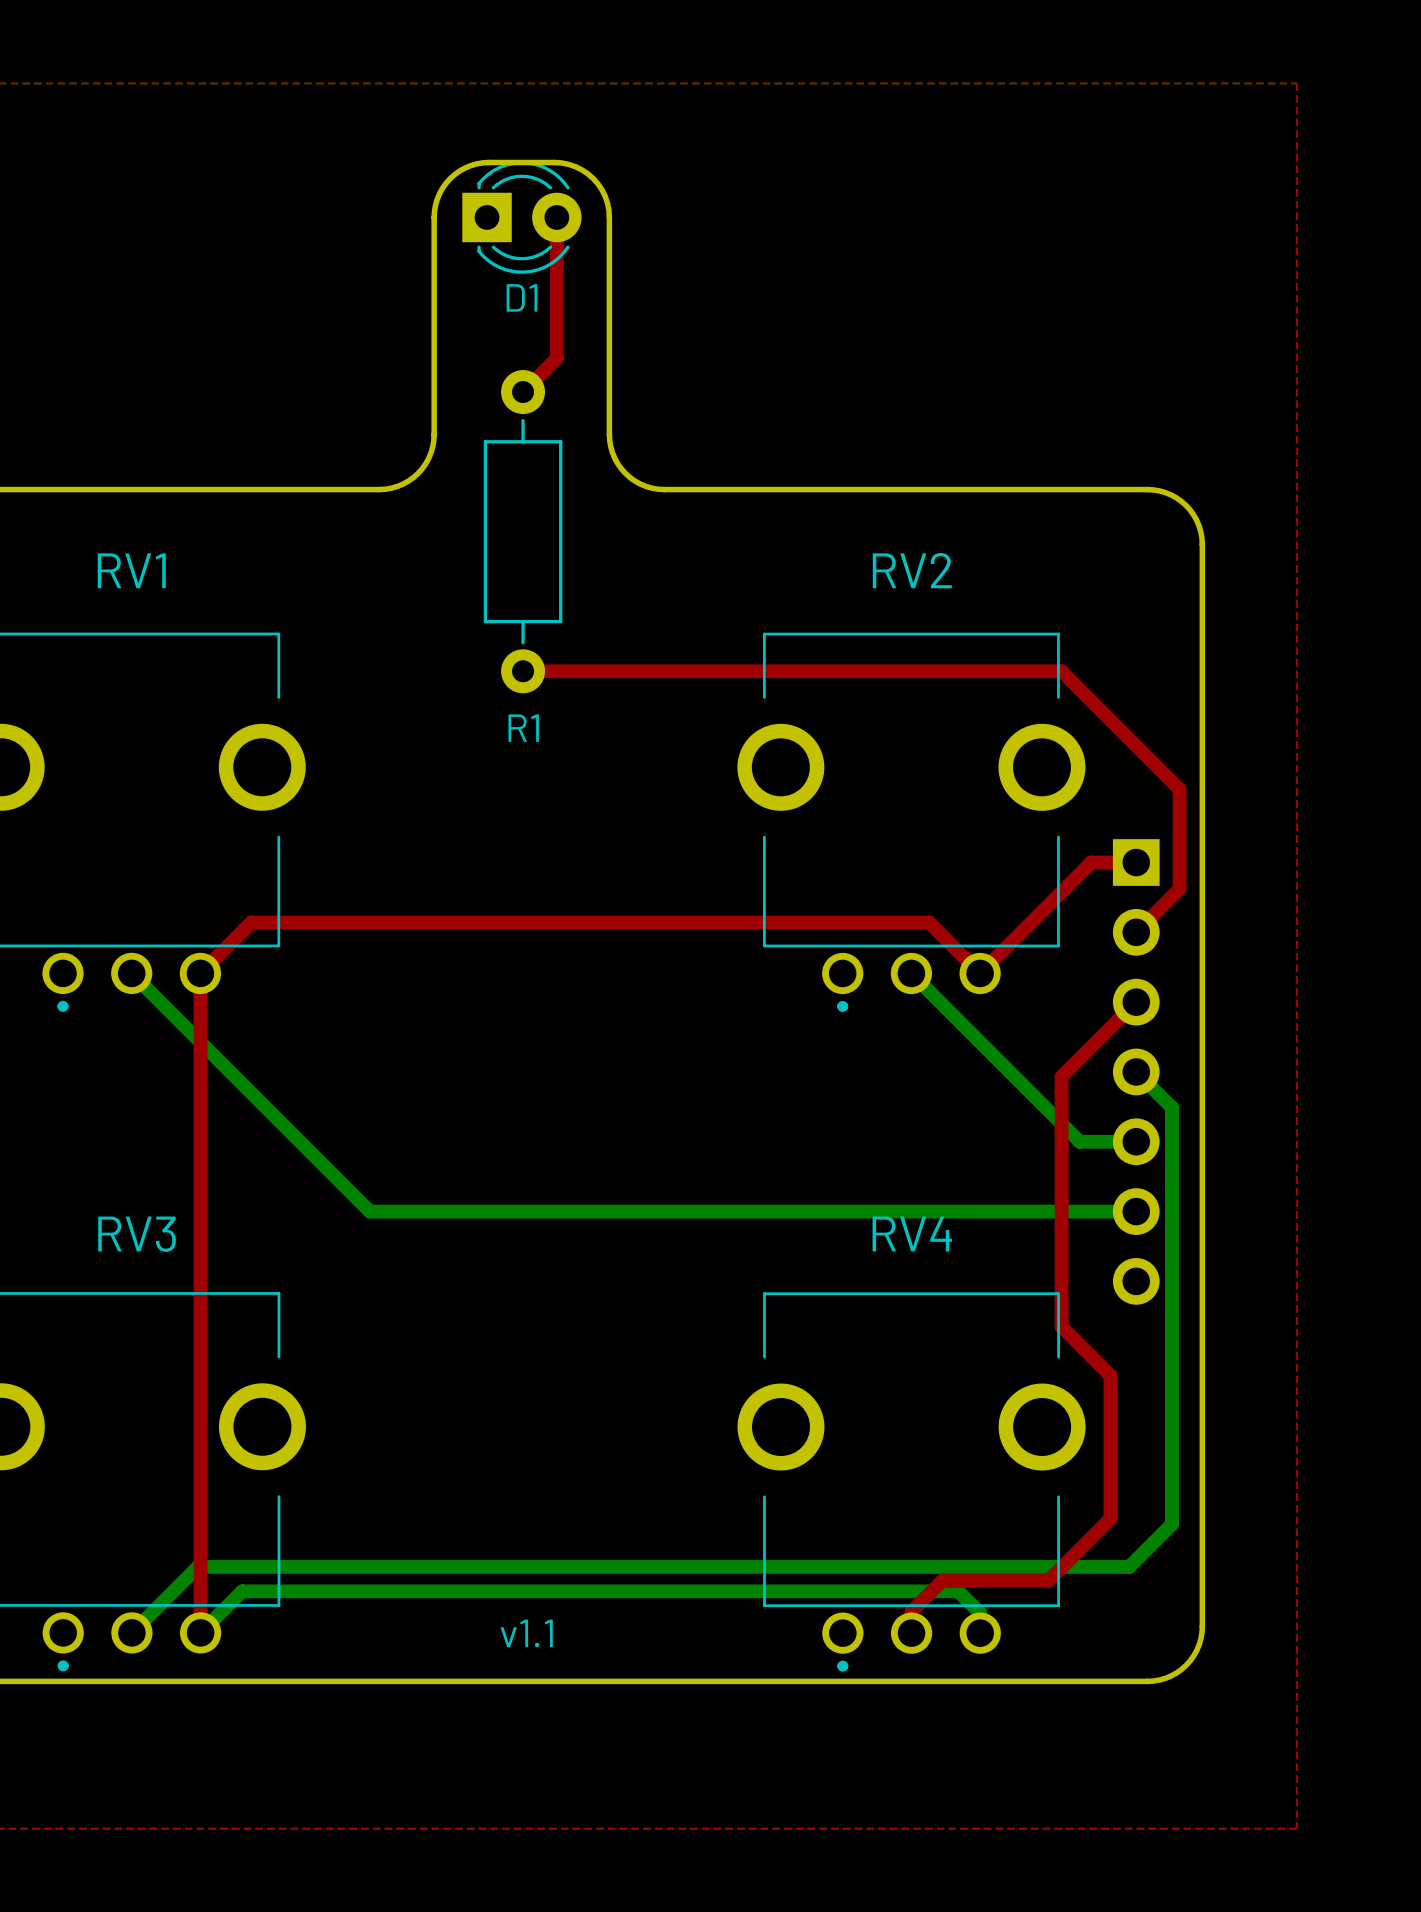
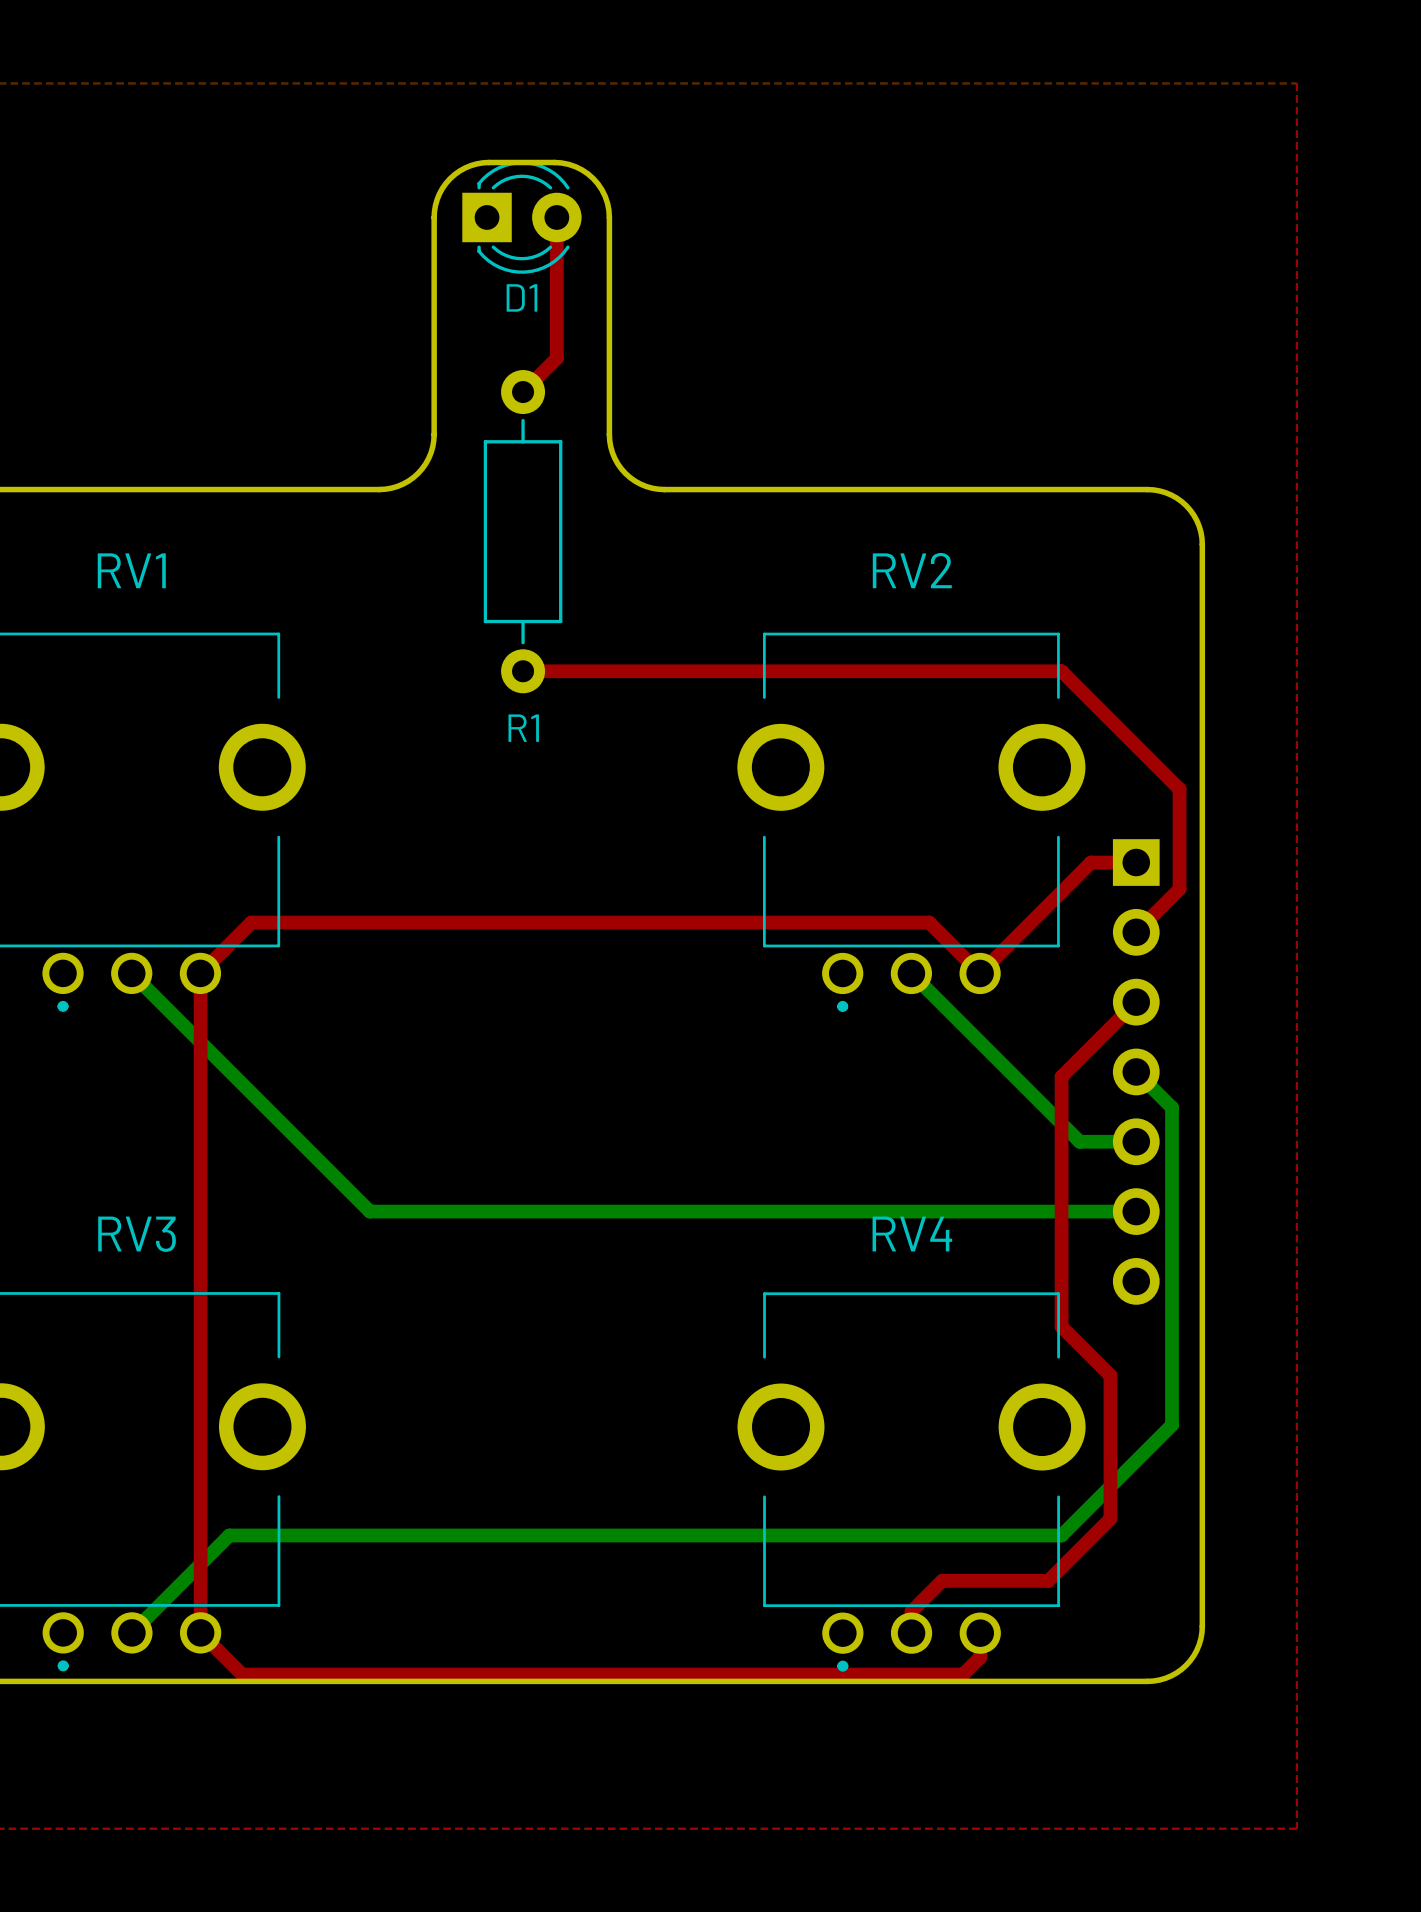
bottom track: (1171, 1425) (1171, 1524) (1129, 1566) (197, 1566) -> (1171, 1425) (1061, 1535) (229, 1535) (197, 1566)
top track: none -> (200, 1632) (242, 1674) (963, 1674) (980, 1657) (980, 1633)
bottom track: (200, 1632) (242, 1591) (958, 1591) (980, 1613) (980, 1633) -> none
text: v1.1 (526, 1633) -> none

